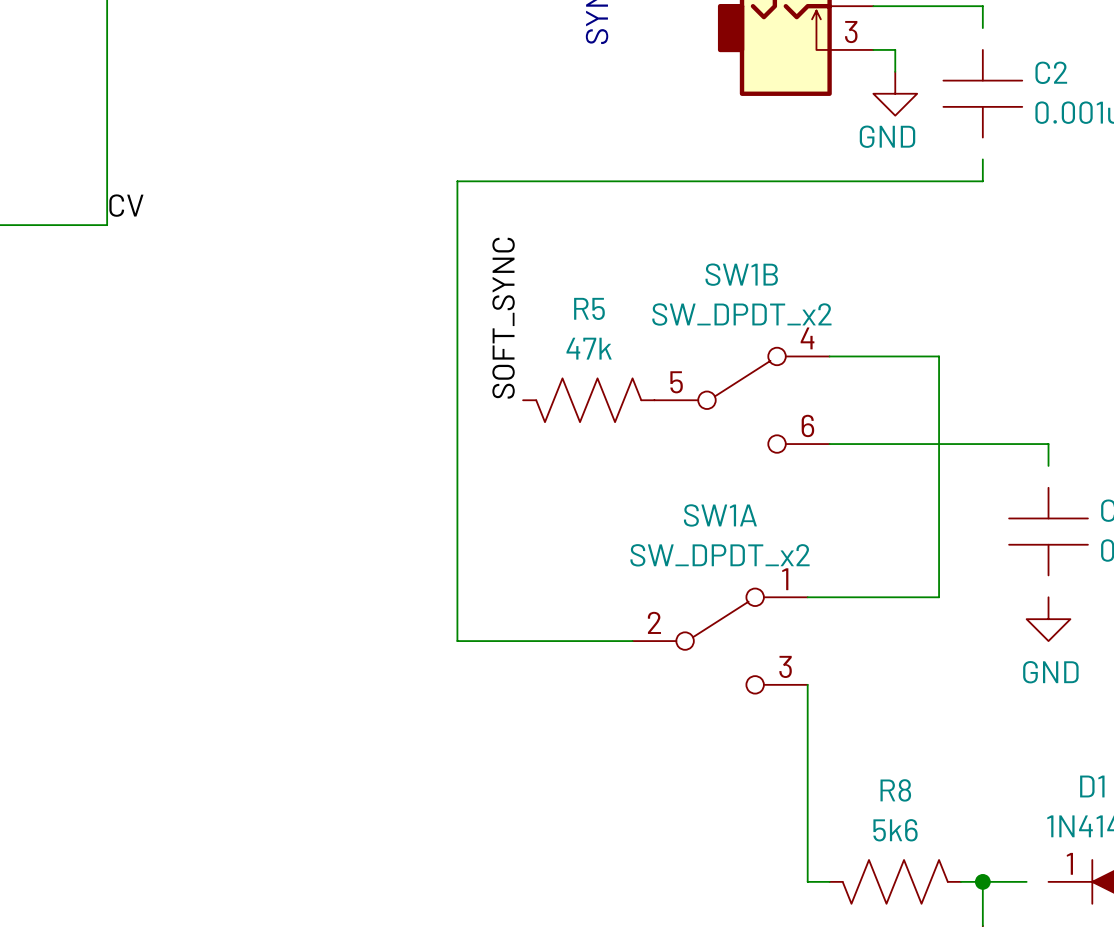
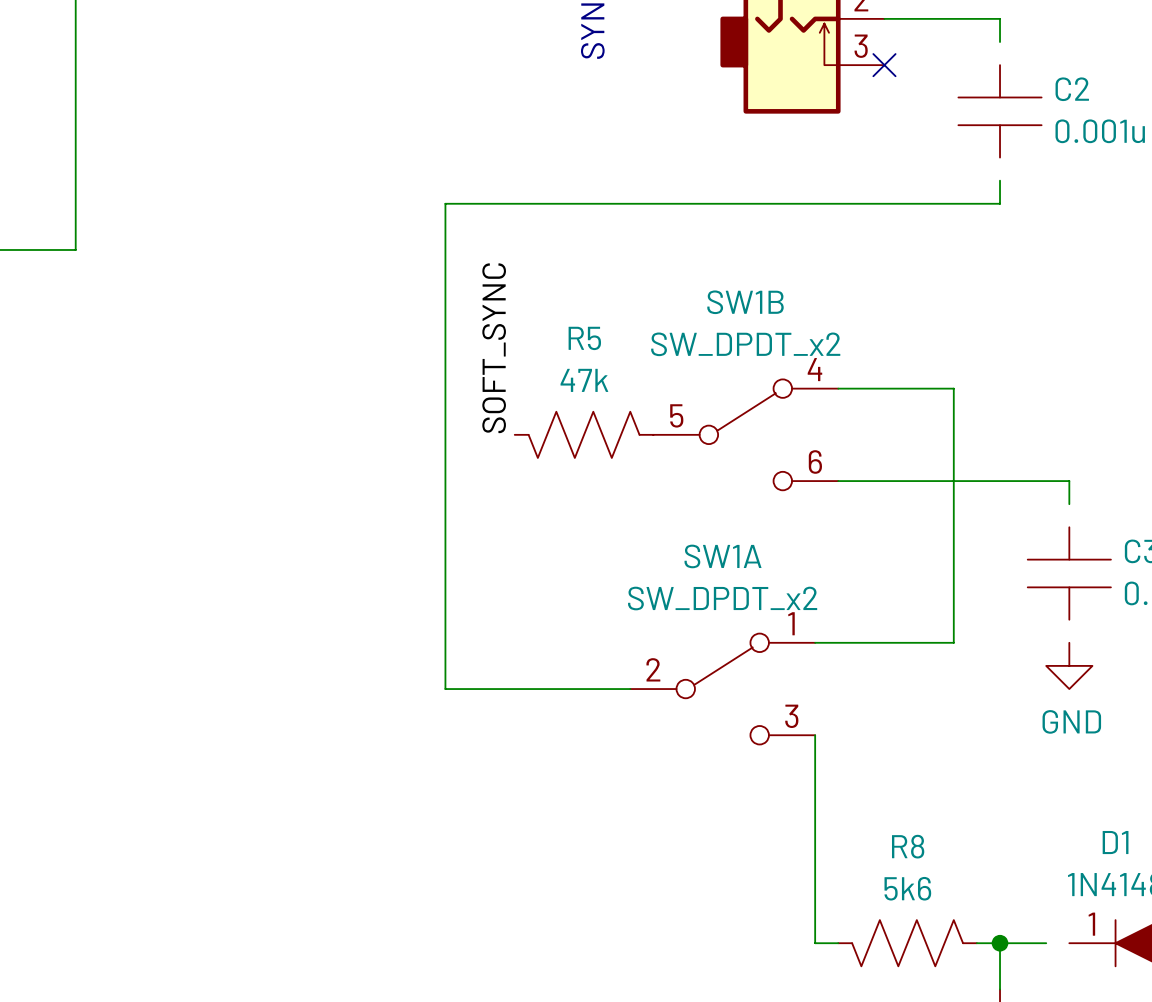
wire: (873, 49) (895, 49) (895, 71) -> none
no-connect mark: none -> (884, 65)
power symbol: GND (895, 93) -> none
label: CV (126, 205) -> none

